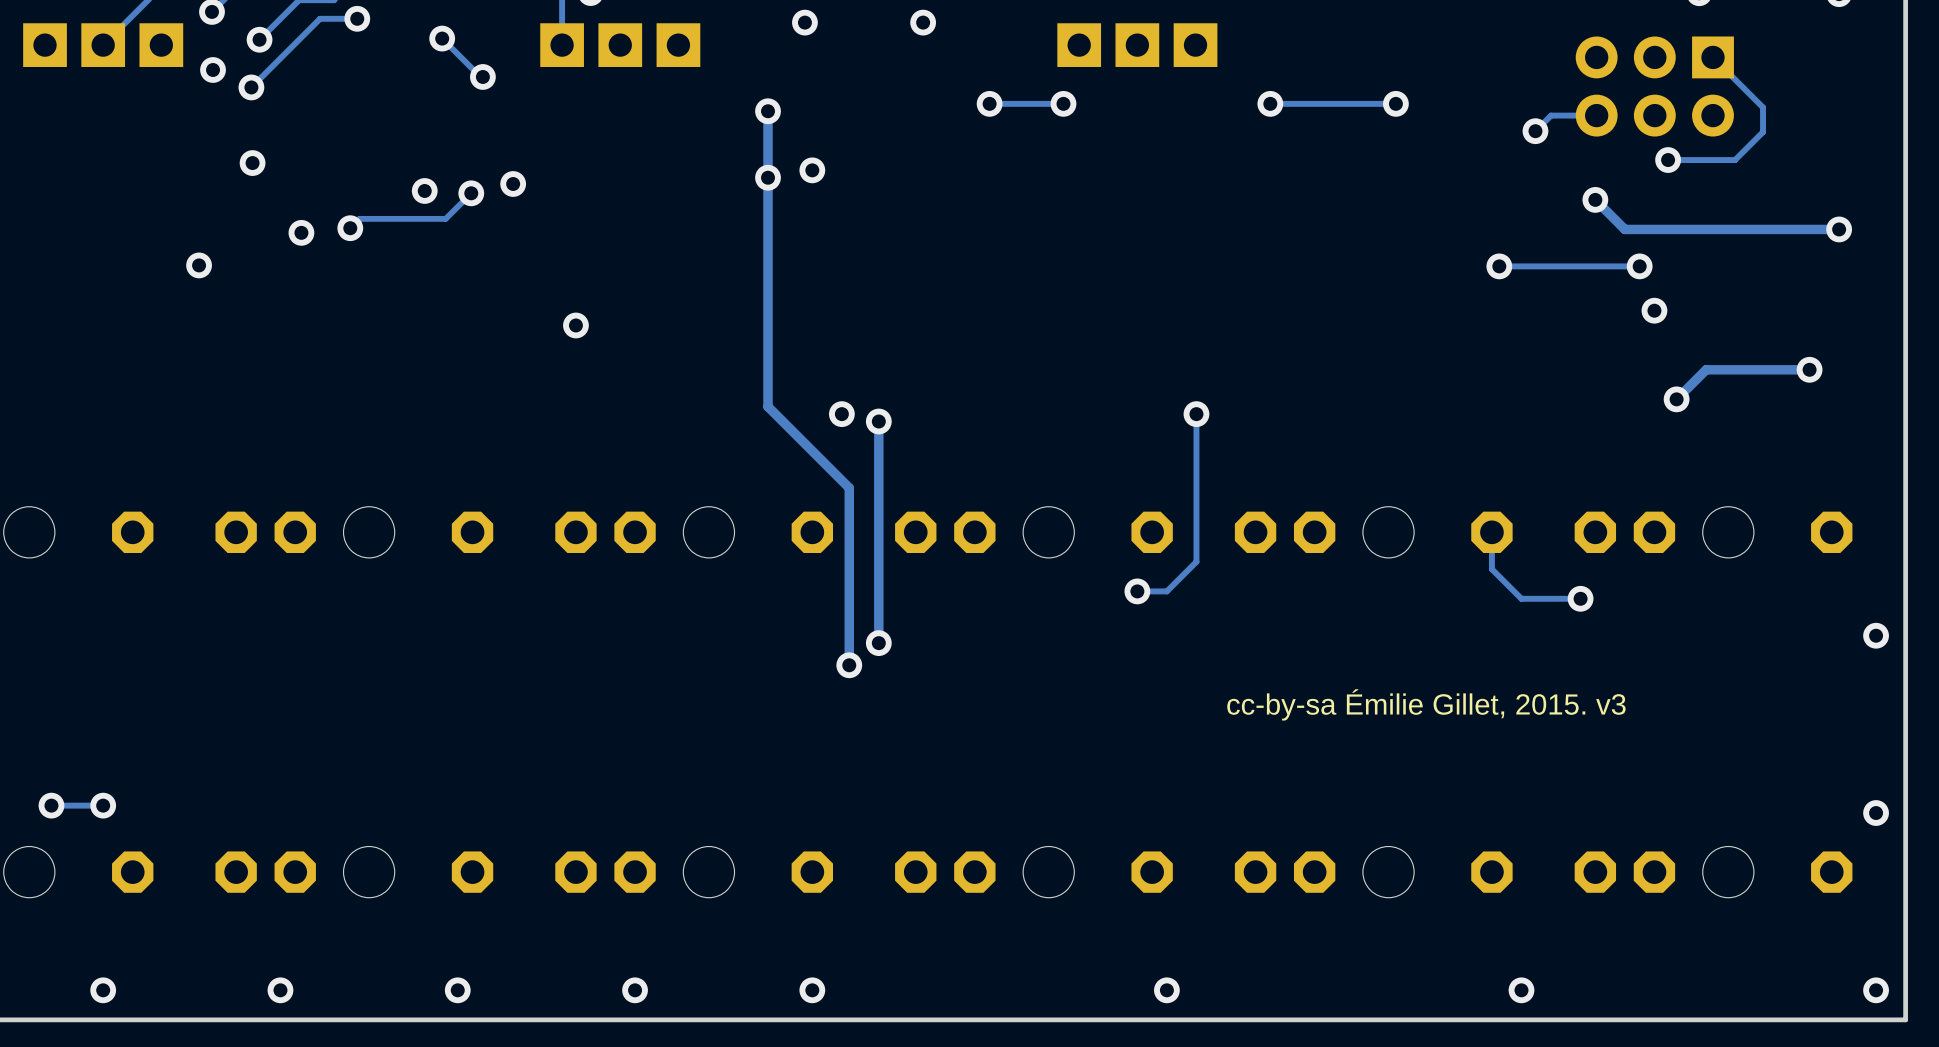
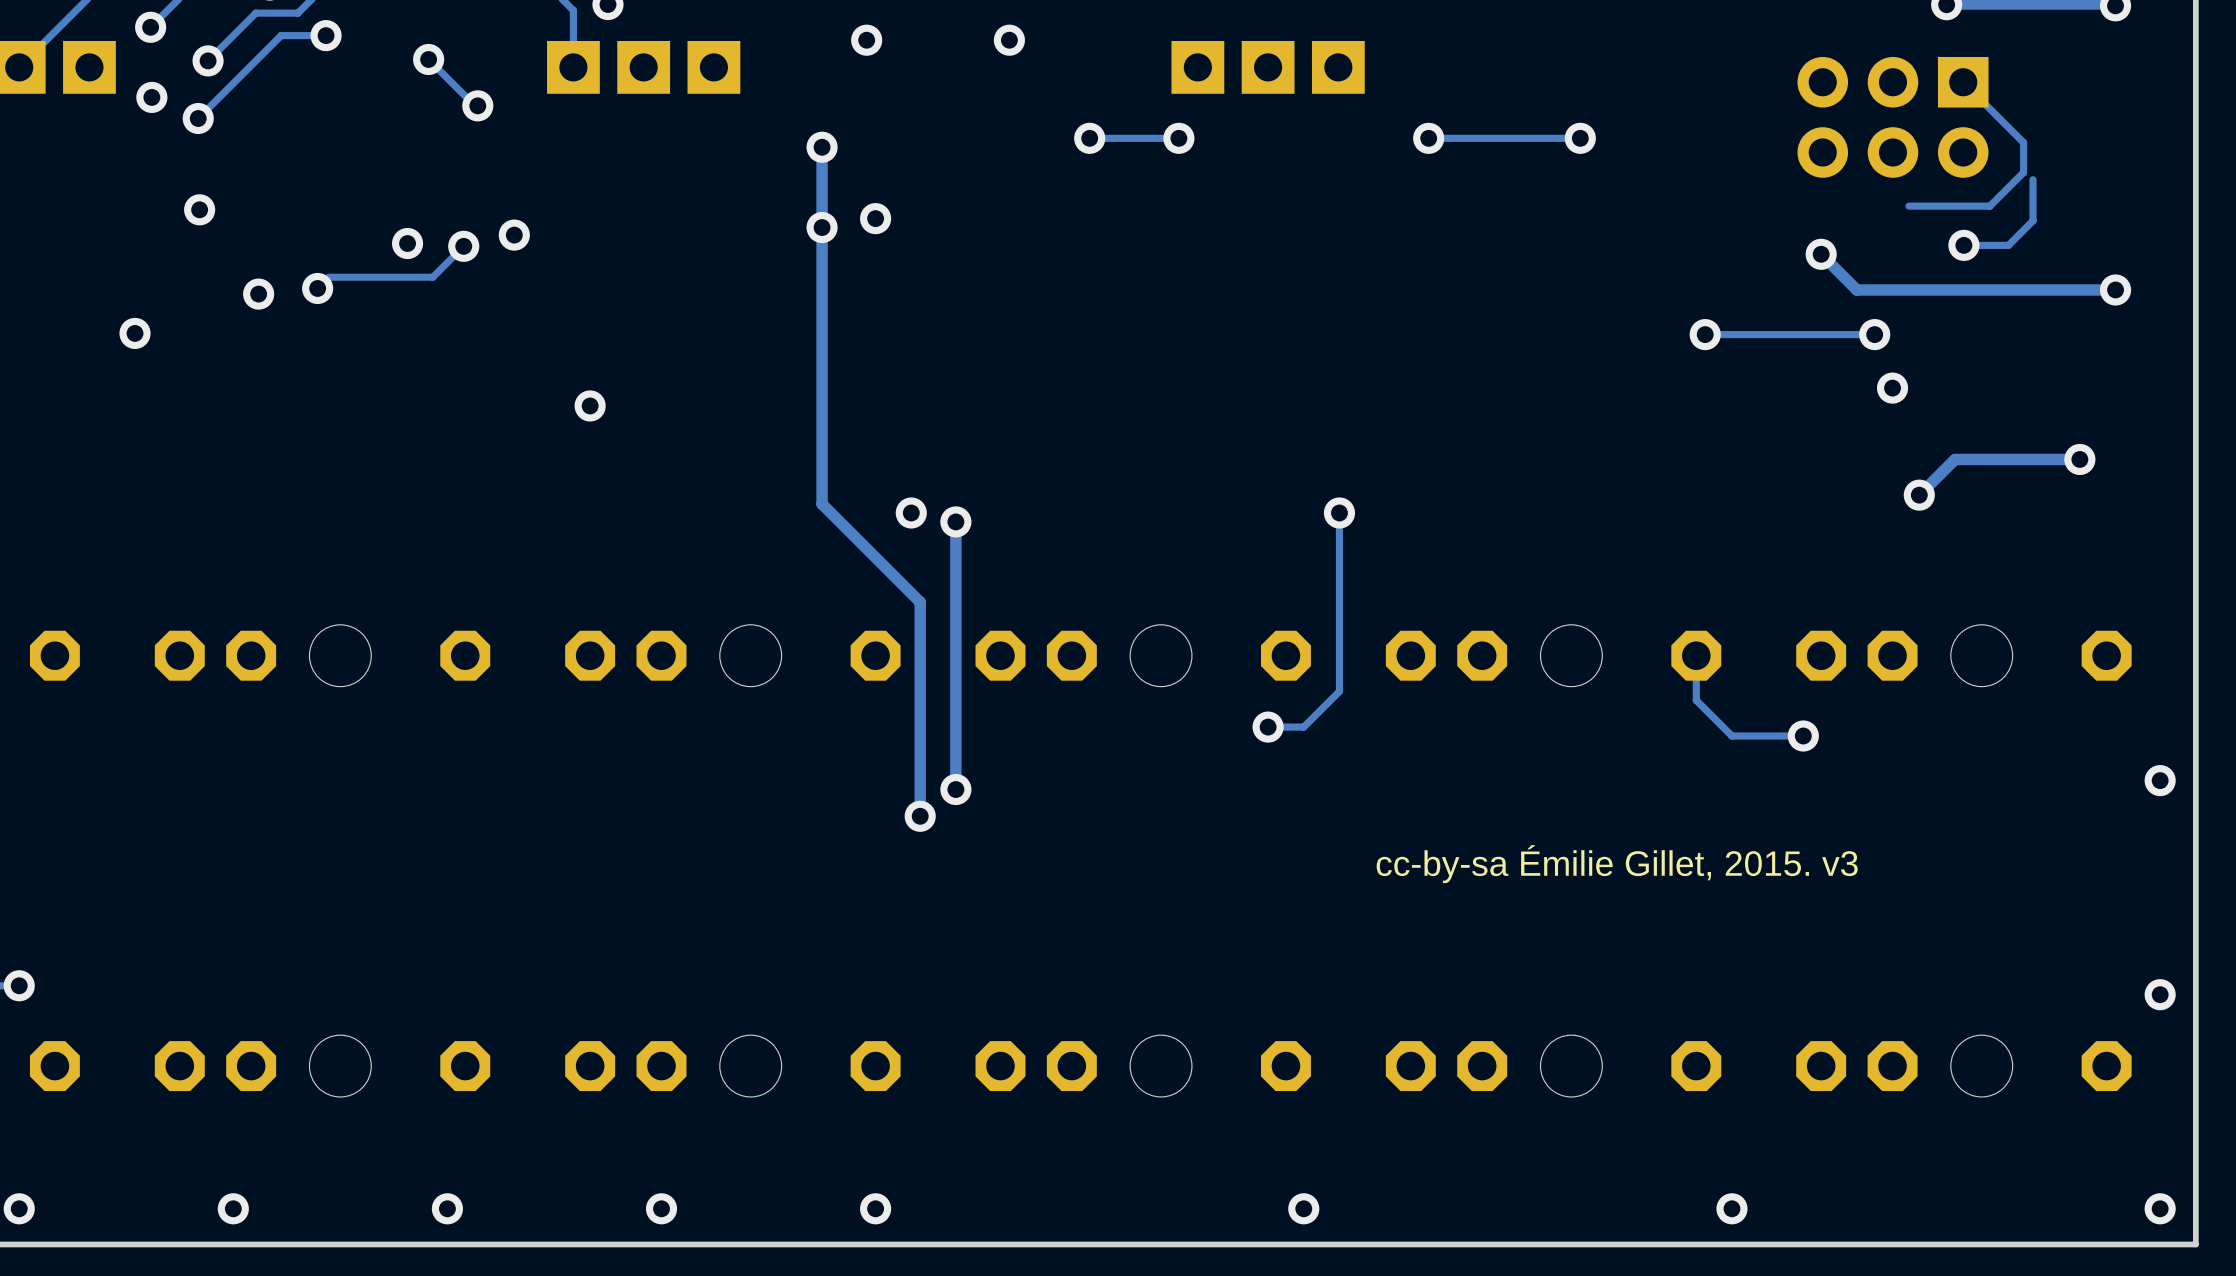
track: (1596, 115) (1551, 115) (1535, 131) -> none
via: (1535, 131) -> none
track: none -> (2033, 179) (2033, 220) (2008, 245) (1963, 245)
via position: (1668, 160) -> (1963, 245)

